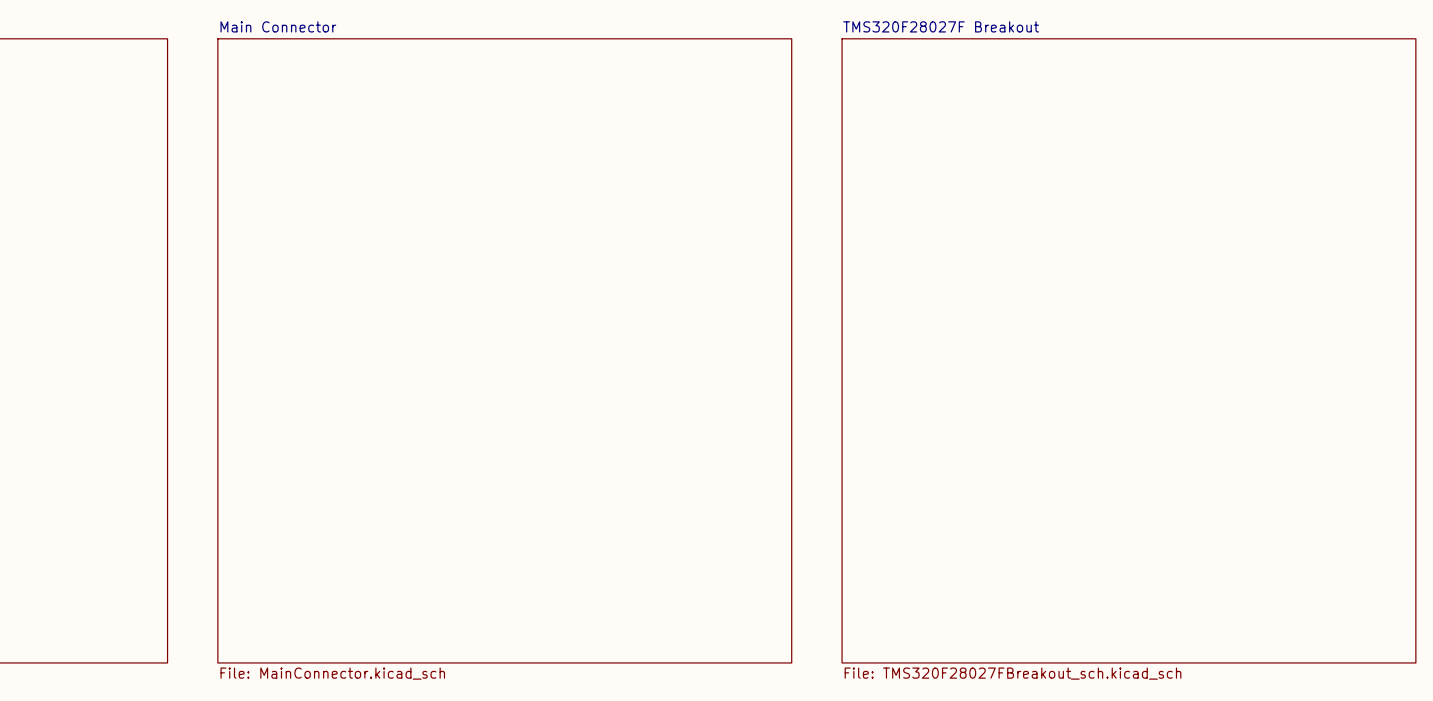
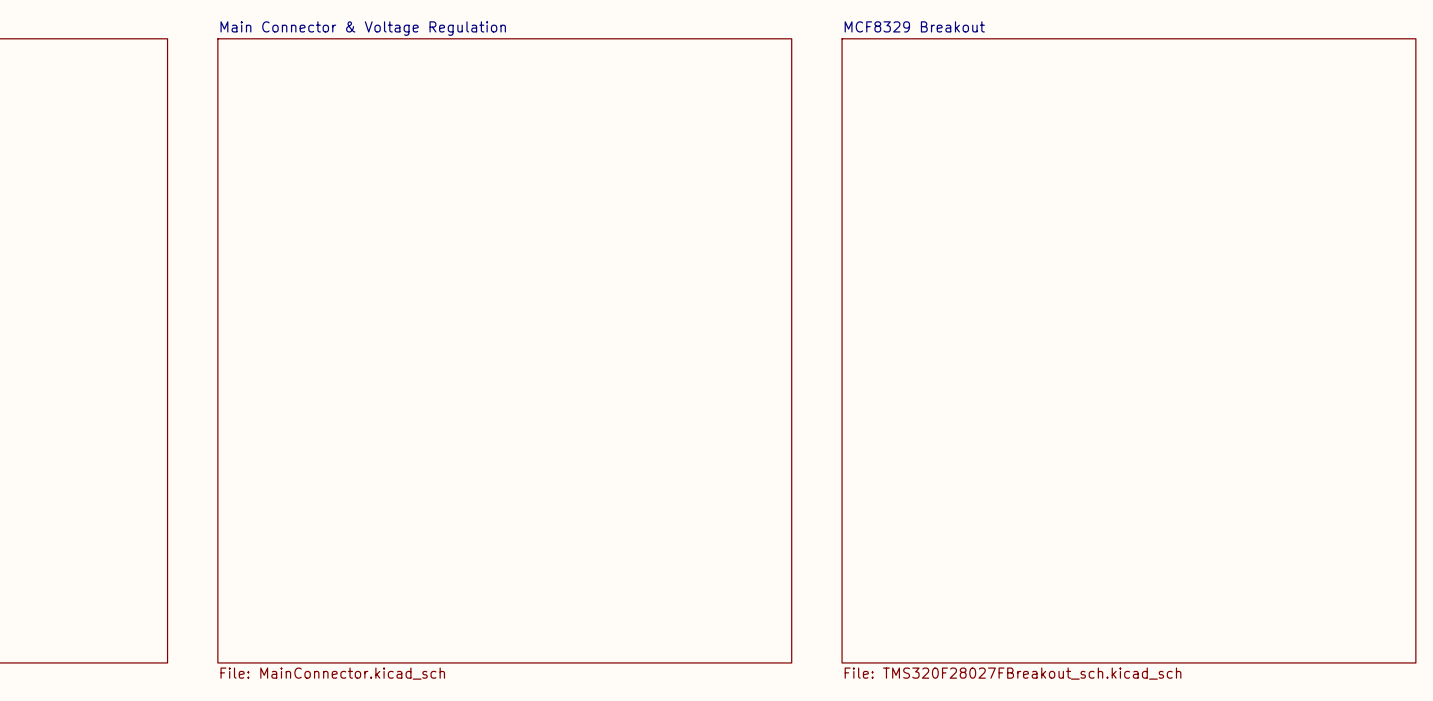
sheet Main Connector name: Main Connector (278, 26) -> Main Connector & Voltage Regulation (363, 28)
sheet TMS320F28027F Breakout name: TMS320F28027F Breakout (941, 26) -> MCF8329 Breakout (914, 26)

